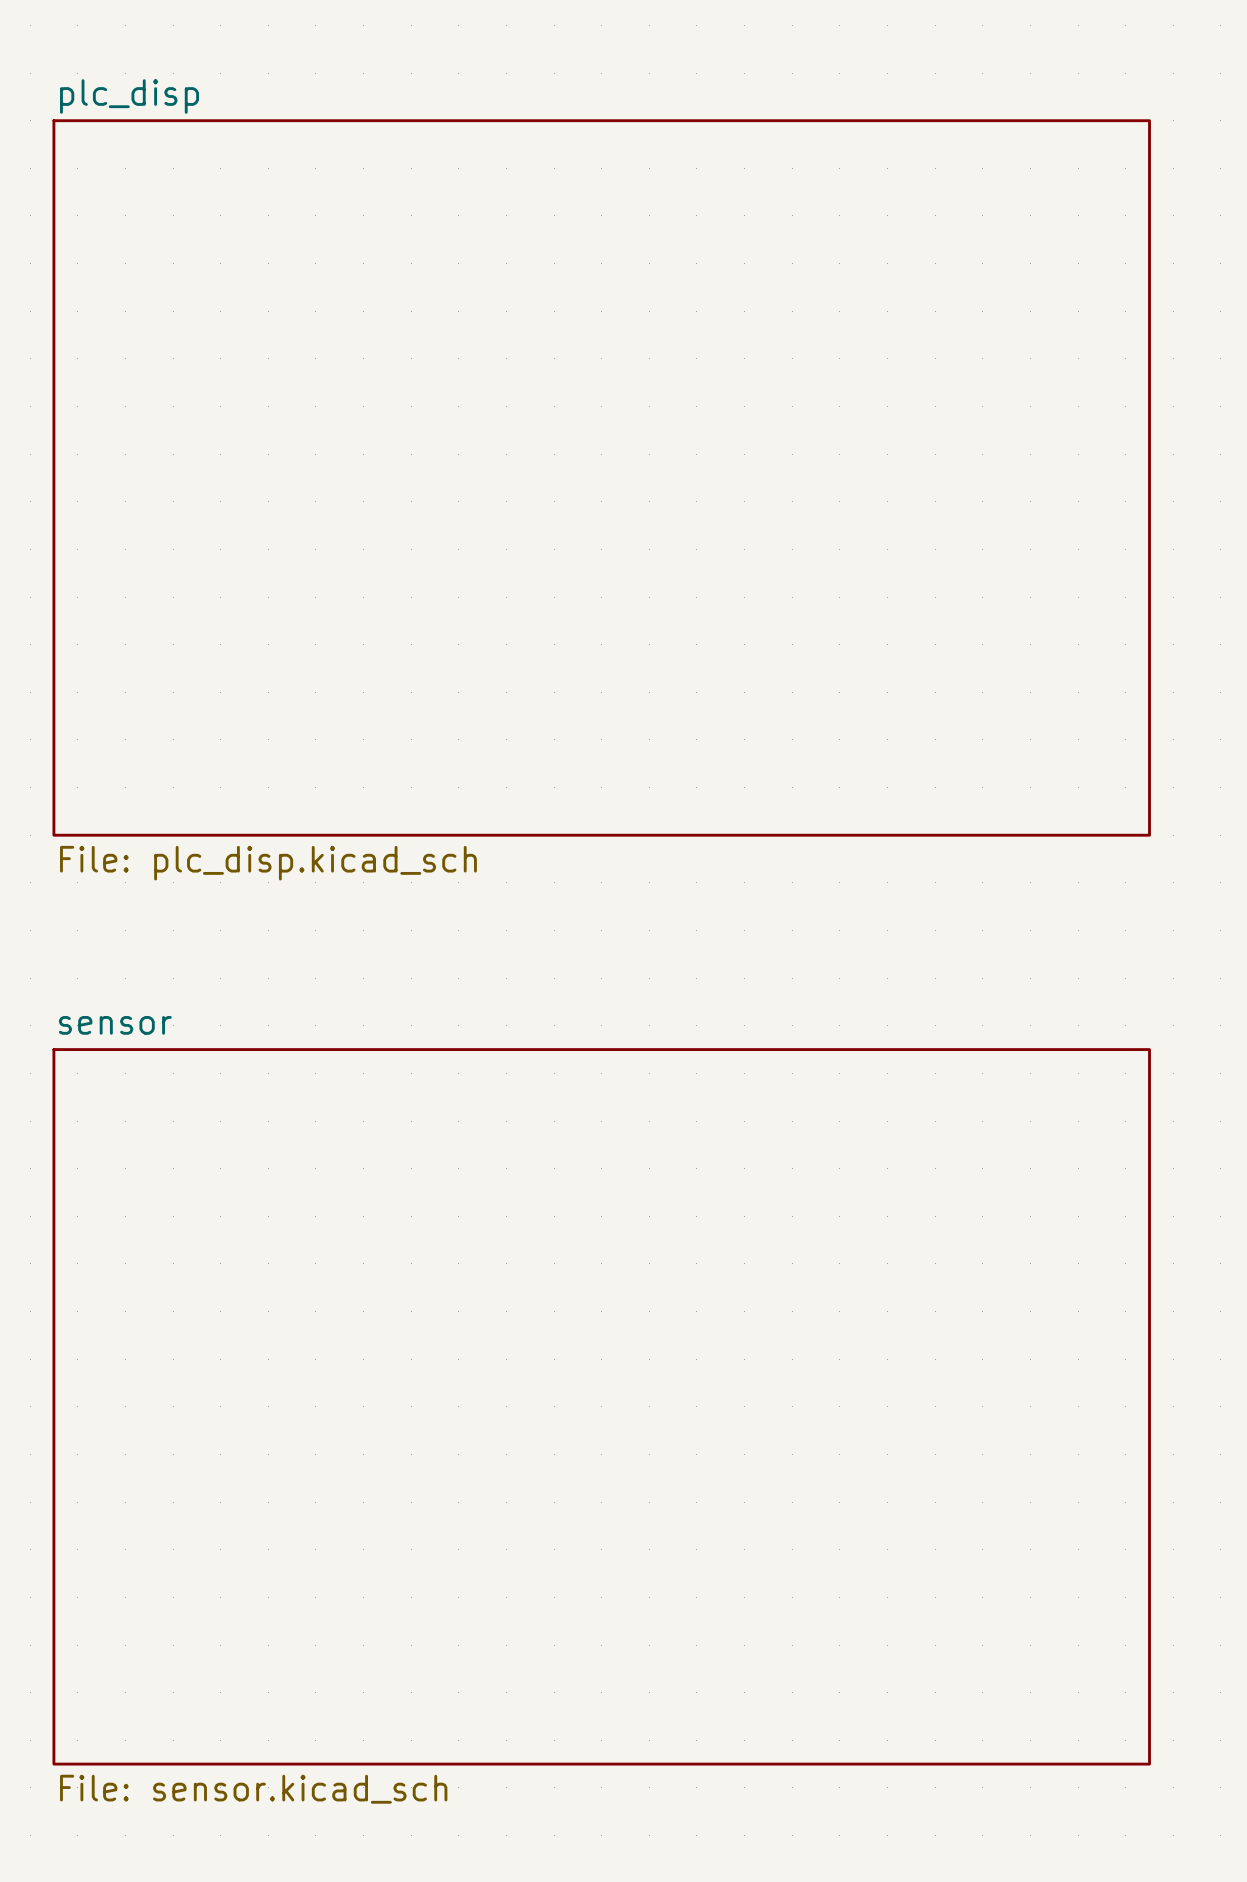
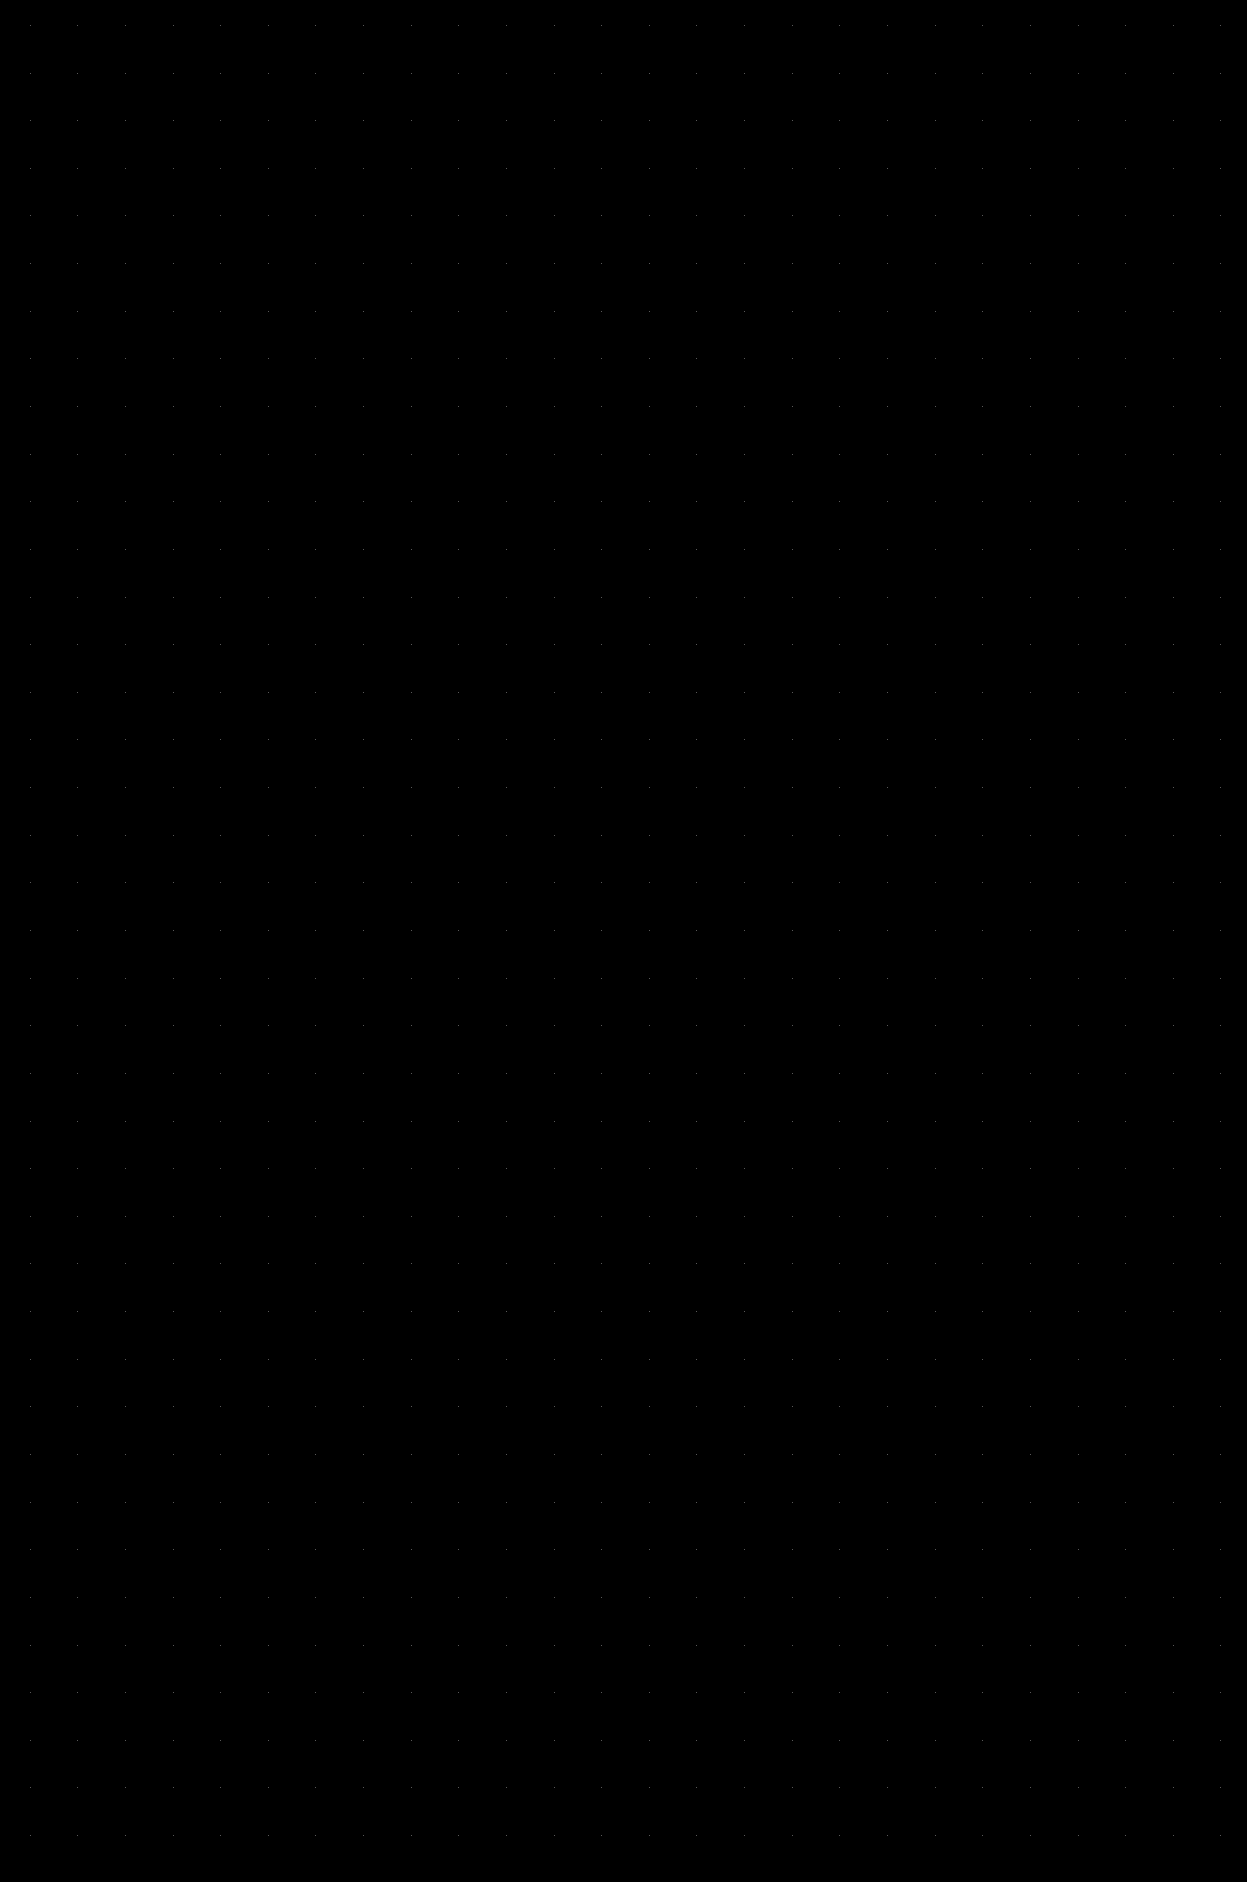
sheet plc_disp: File: plc_disp.kicad_sch (601, 477) -> none
sheet sensor: File: sensor.kicad_sch (601, 1406) -> none

